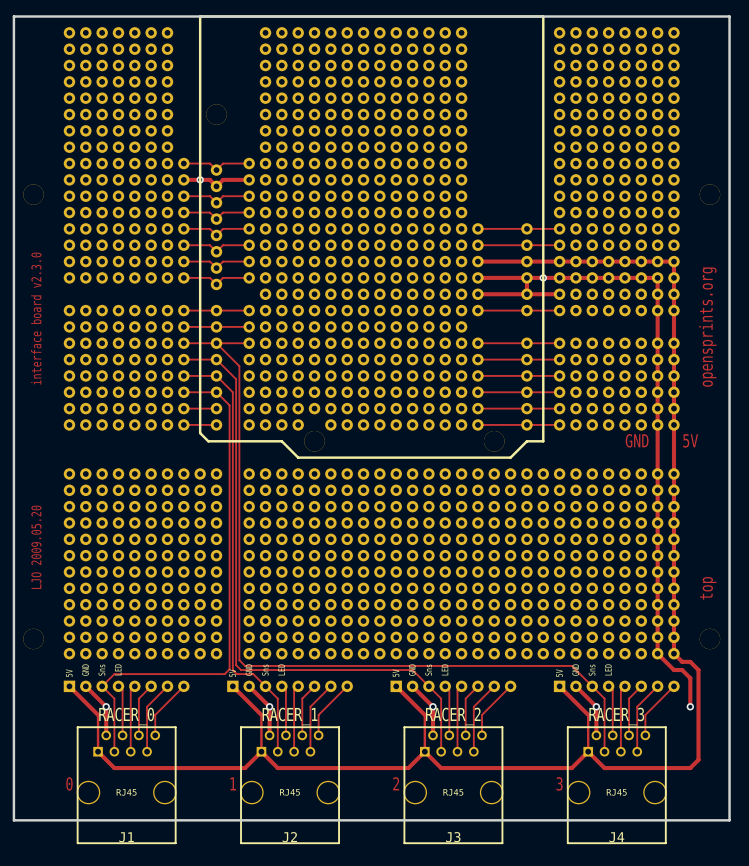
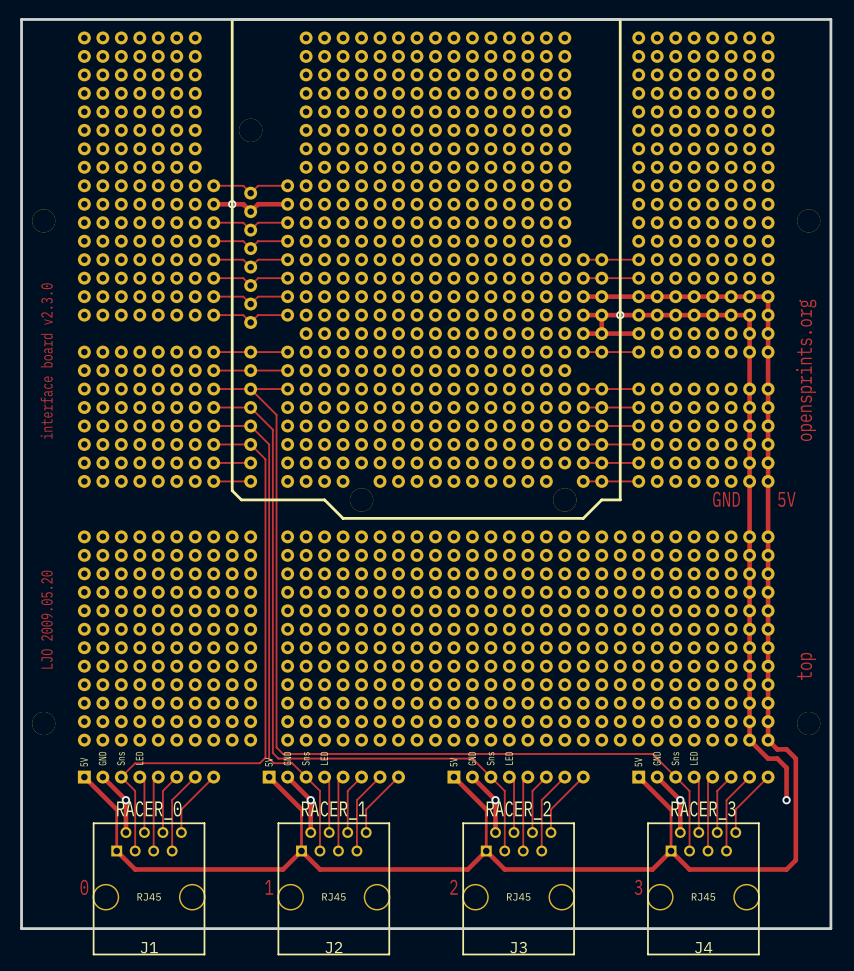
part: none -> (435, 259)
track: (477, 228) (510, 228) -> none
track: (477, 245) (510, 245) -> none
track: (477, 261) (510, 261) -> none
part position: (477, 269) -> (583, 305)
track: (477, 277) (510, 277) -> none
track: (477, 294) (510, 294) -> none
track: (477, 310) (510, 310) -> none
track: (477, 343) (510, 343) -> none
track: (477, 359) (510, 359) -> none
track: (477, 375) (510, 375) -> none
part position: (477, 384) -> (583, 435)
track: (477, 392) (510, 392) -> none
track: (477, 408) (510, 408) -> none
track: (477, 424) (510, 424) -> none

